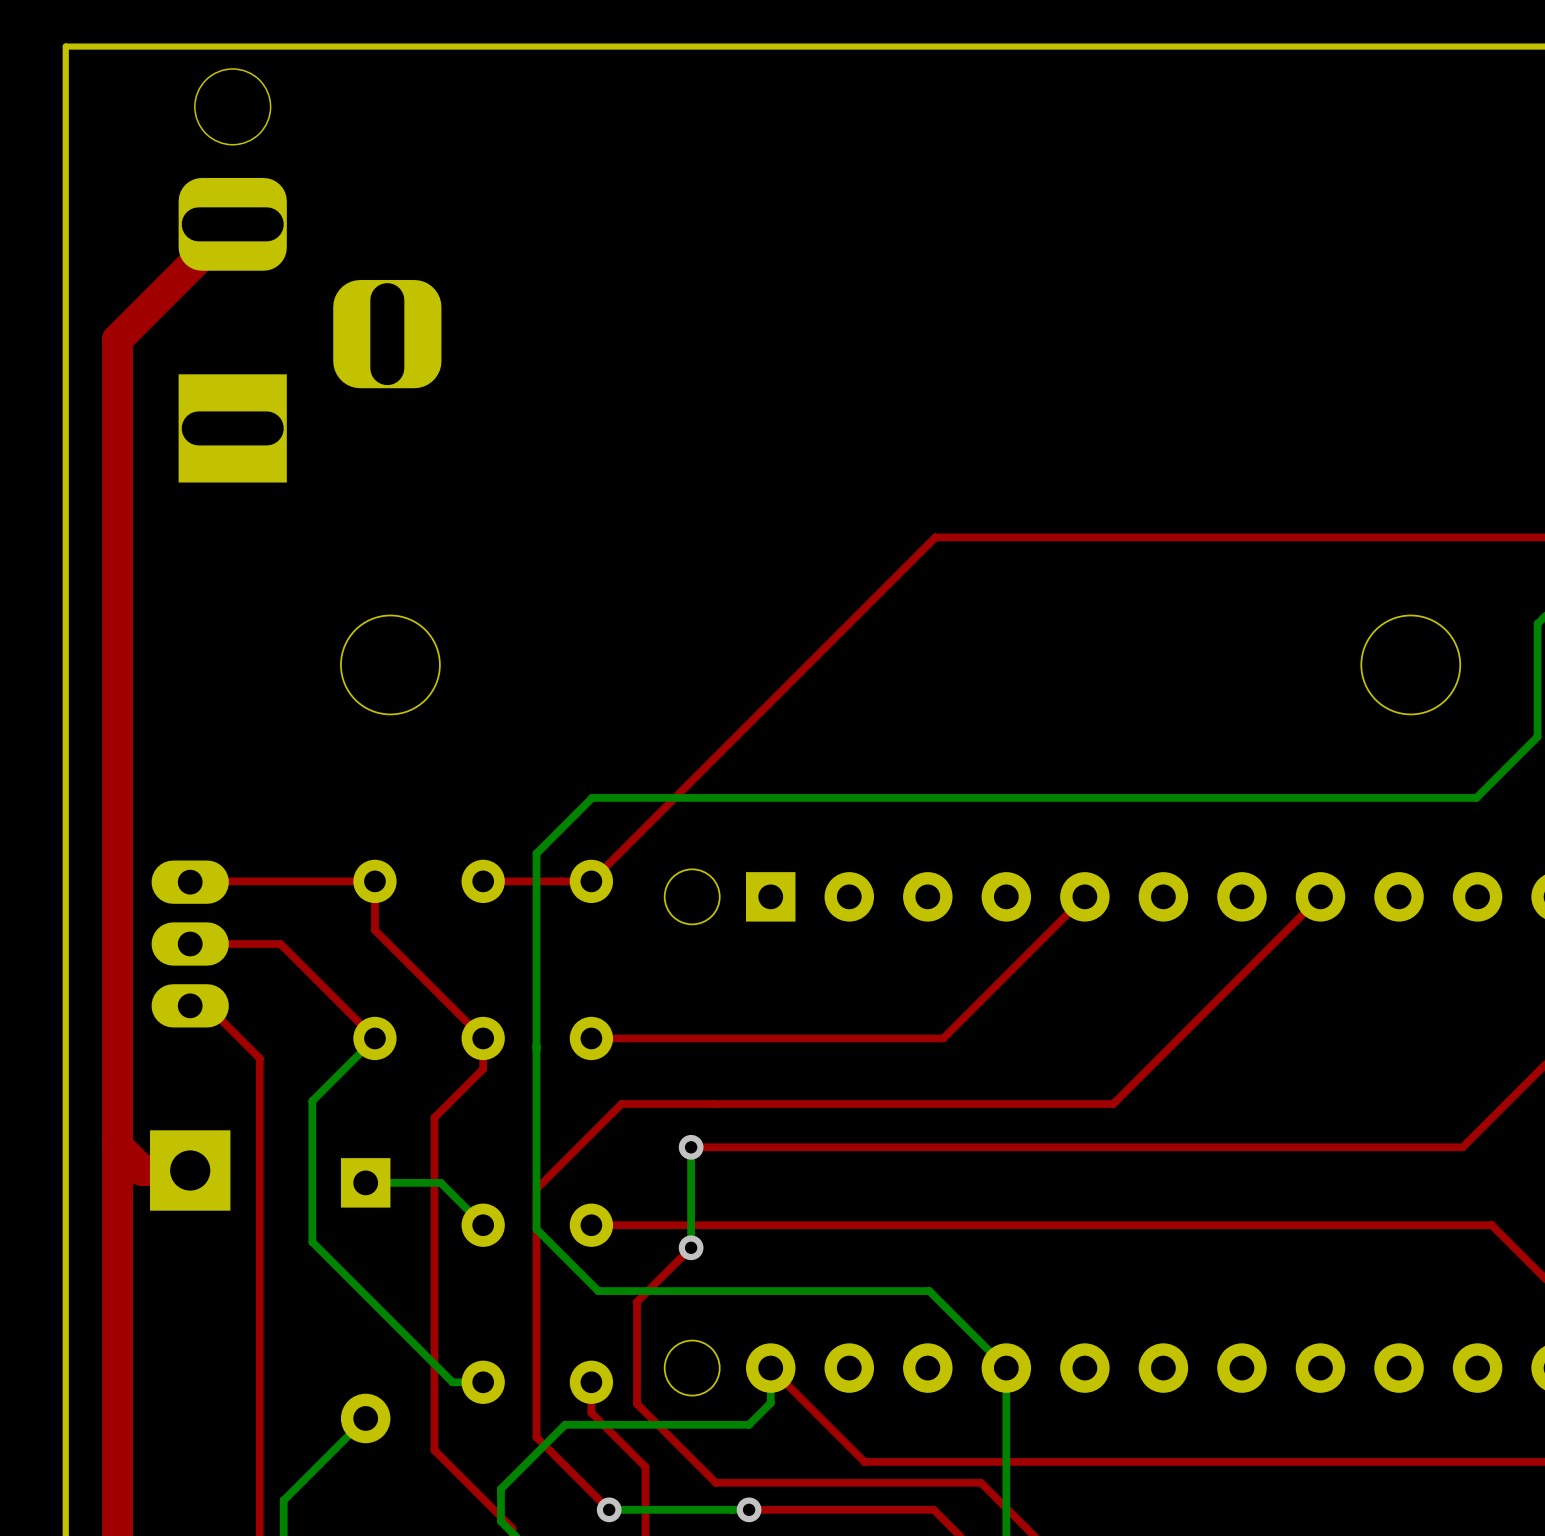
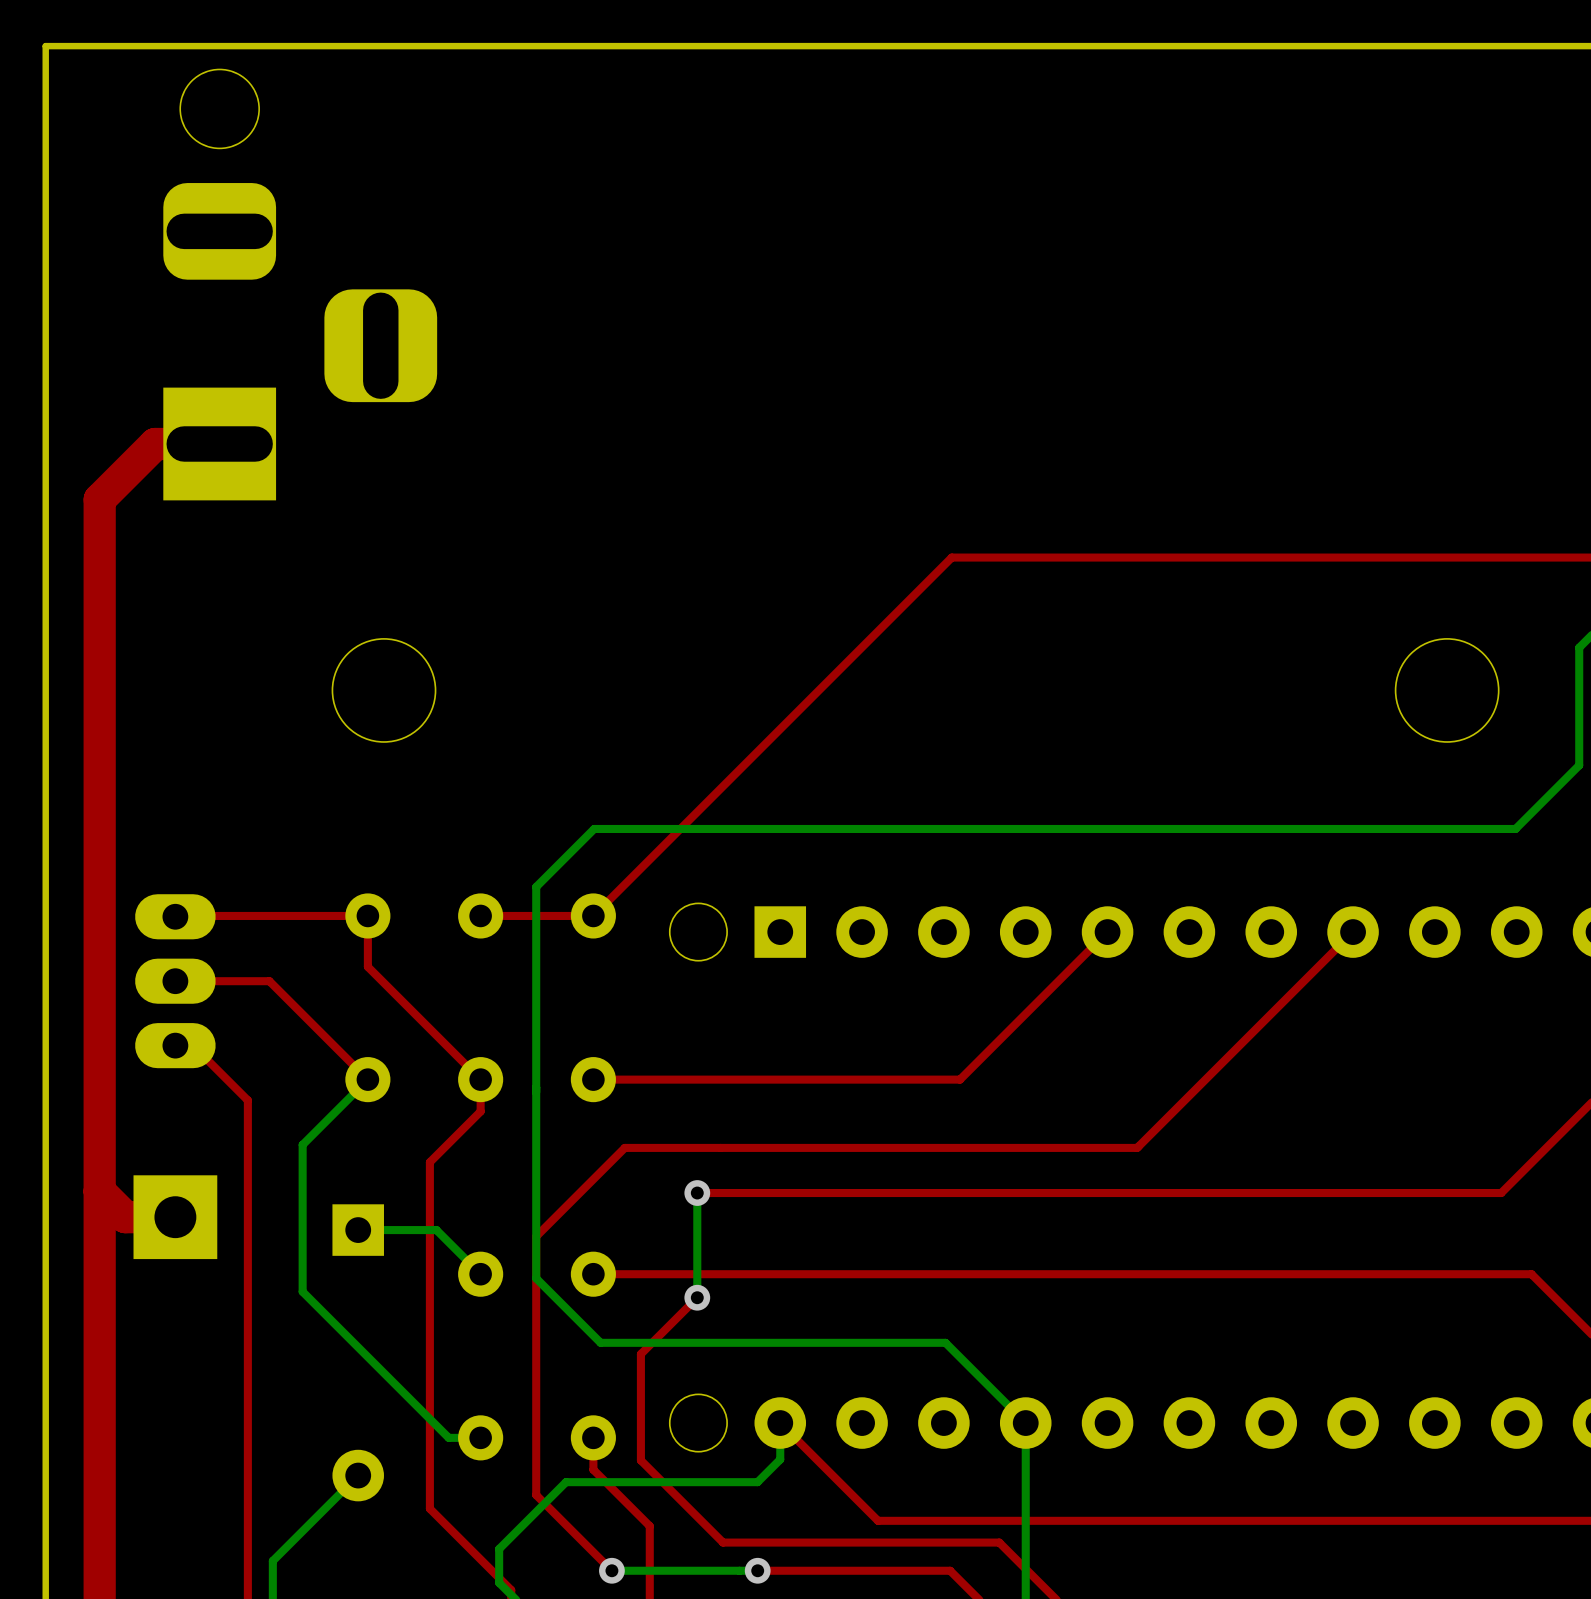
top track: (232, 224) (117, 339) (117, 481) -> (219, 443) (155, 443) (99, 499)

